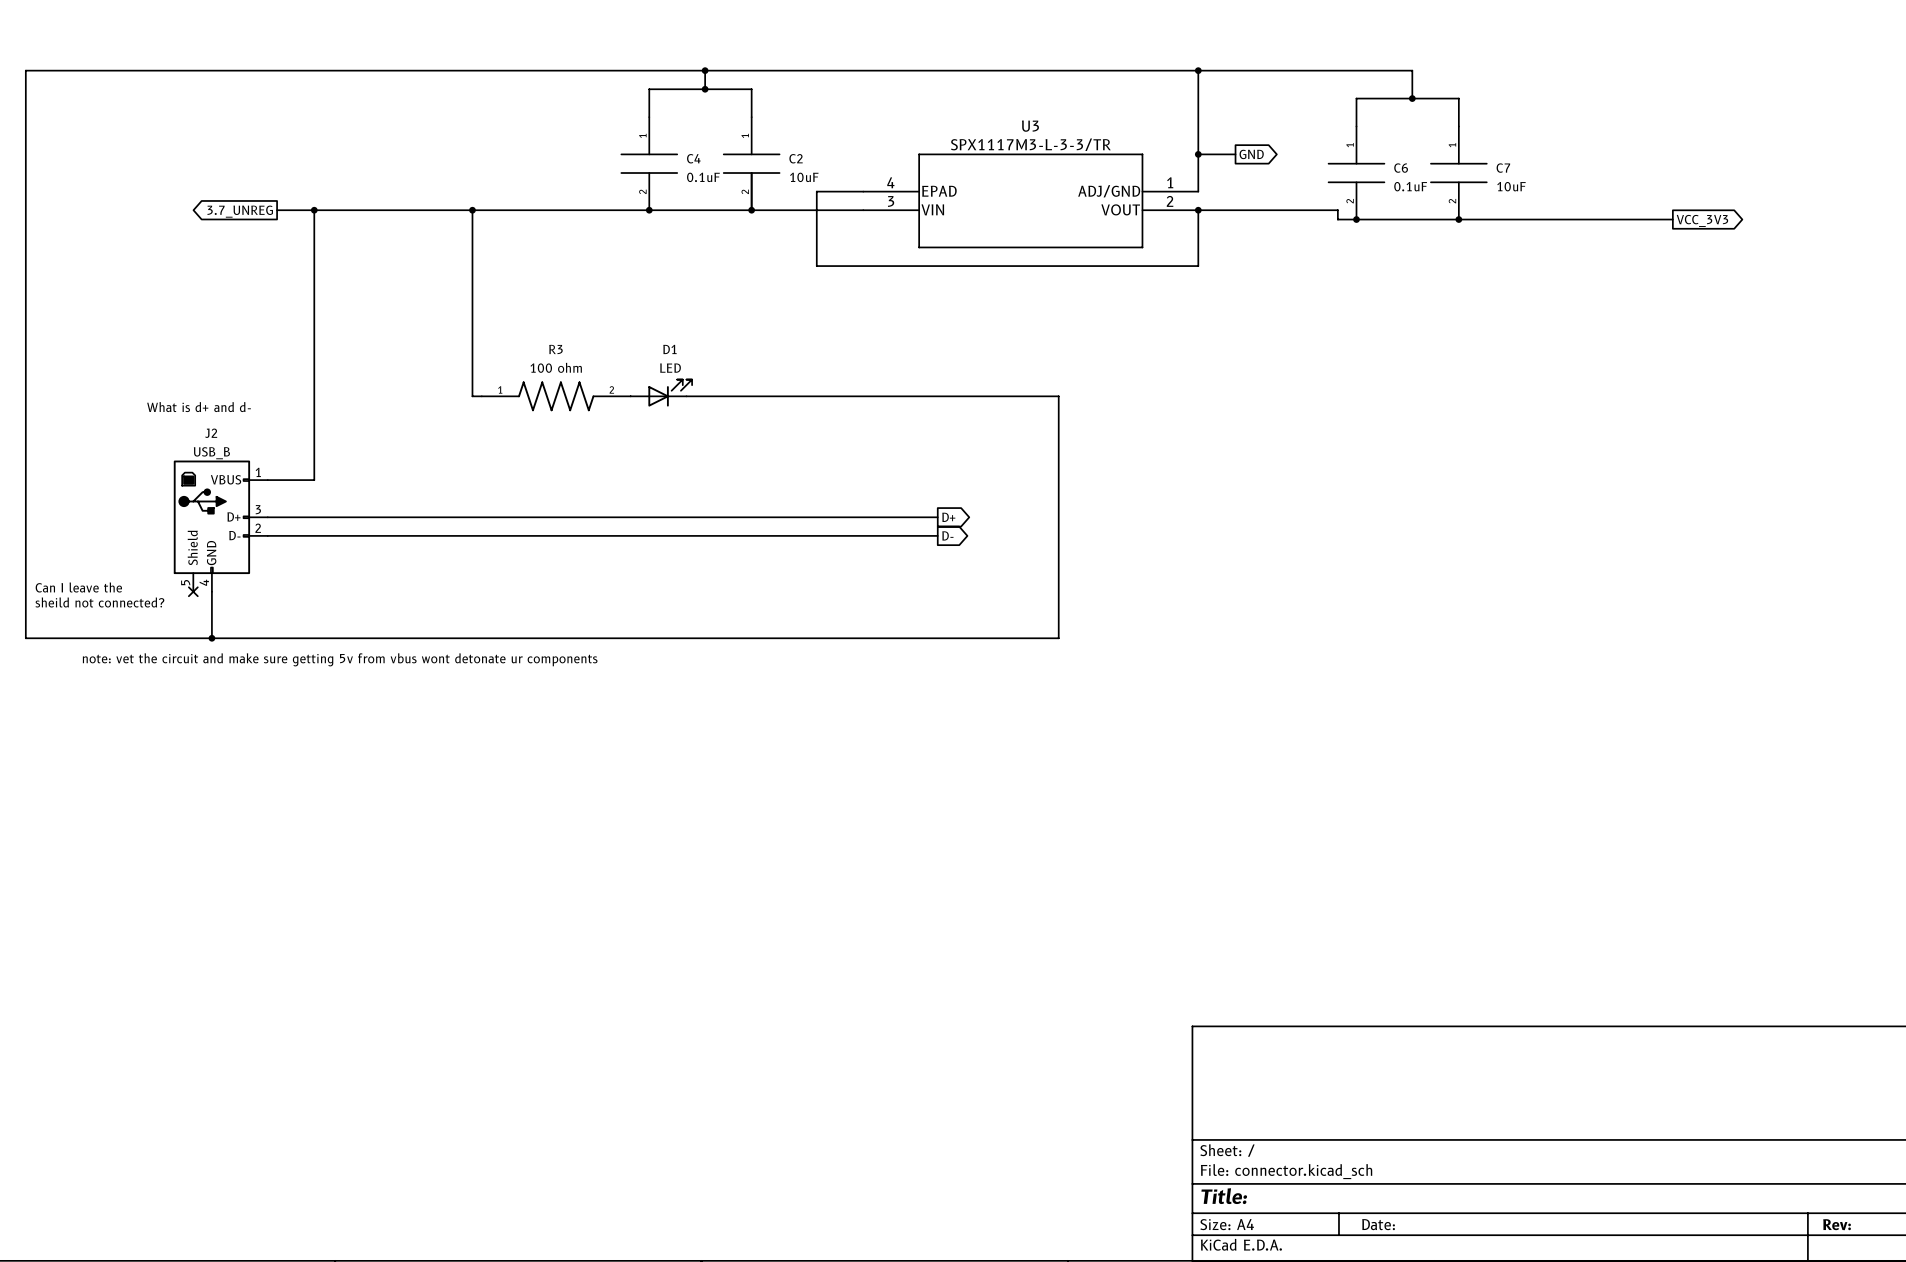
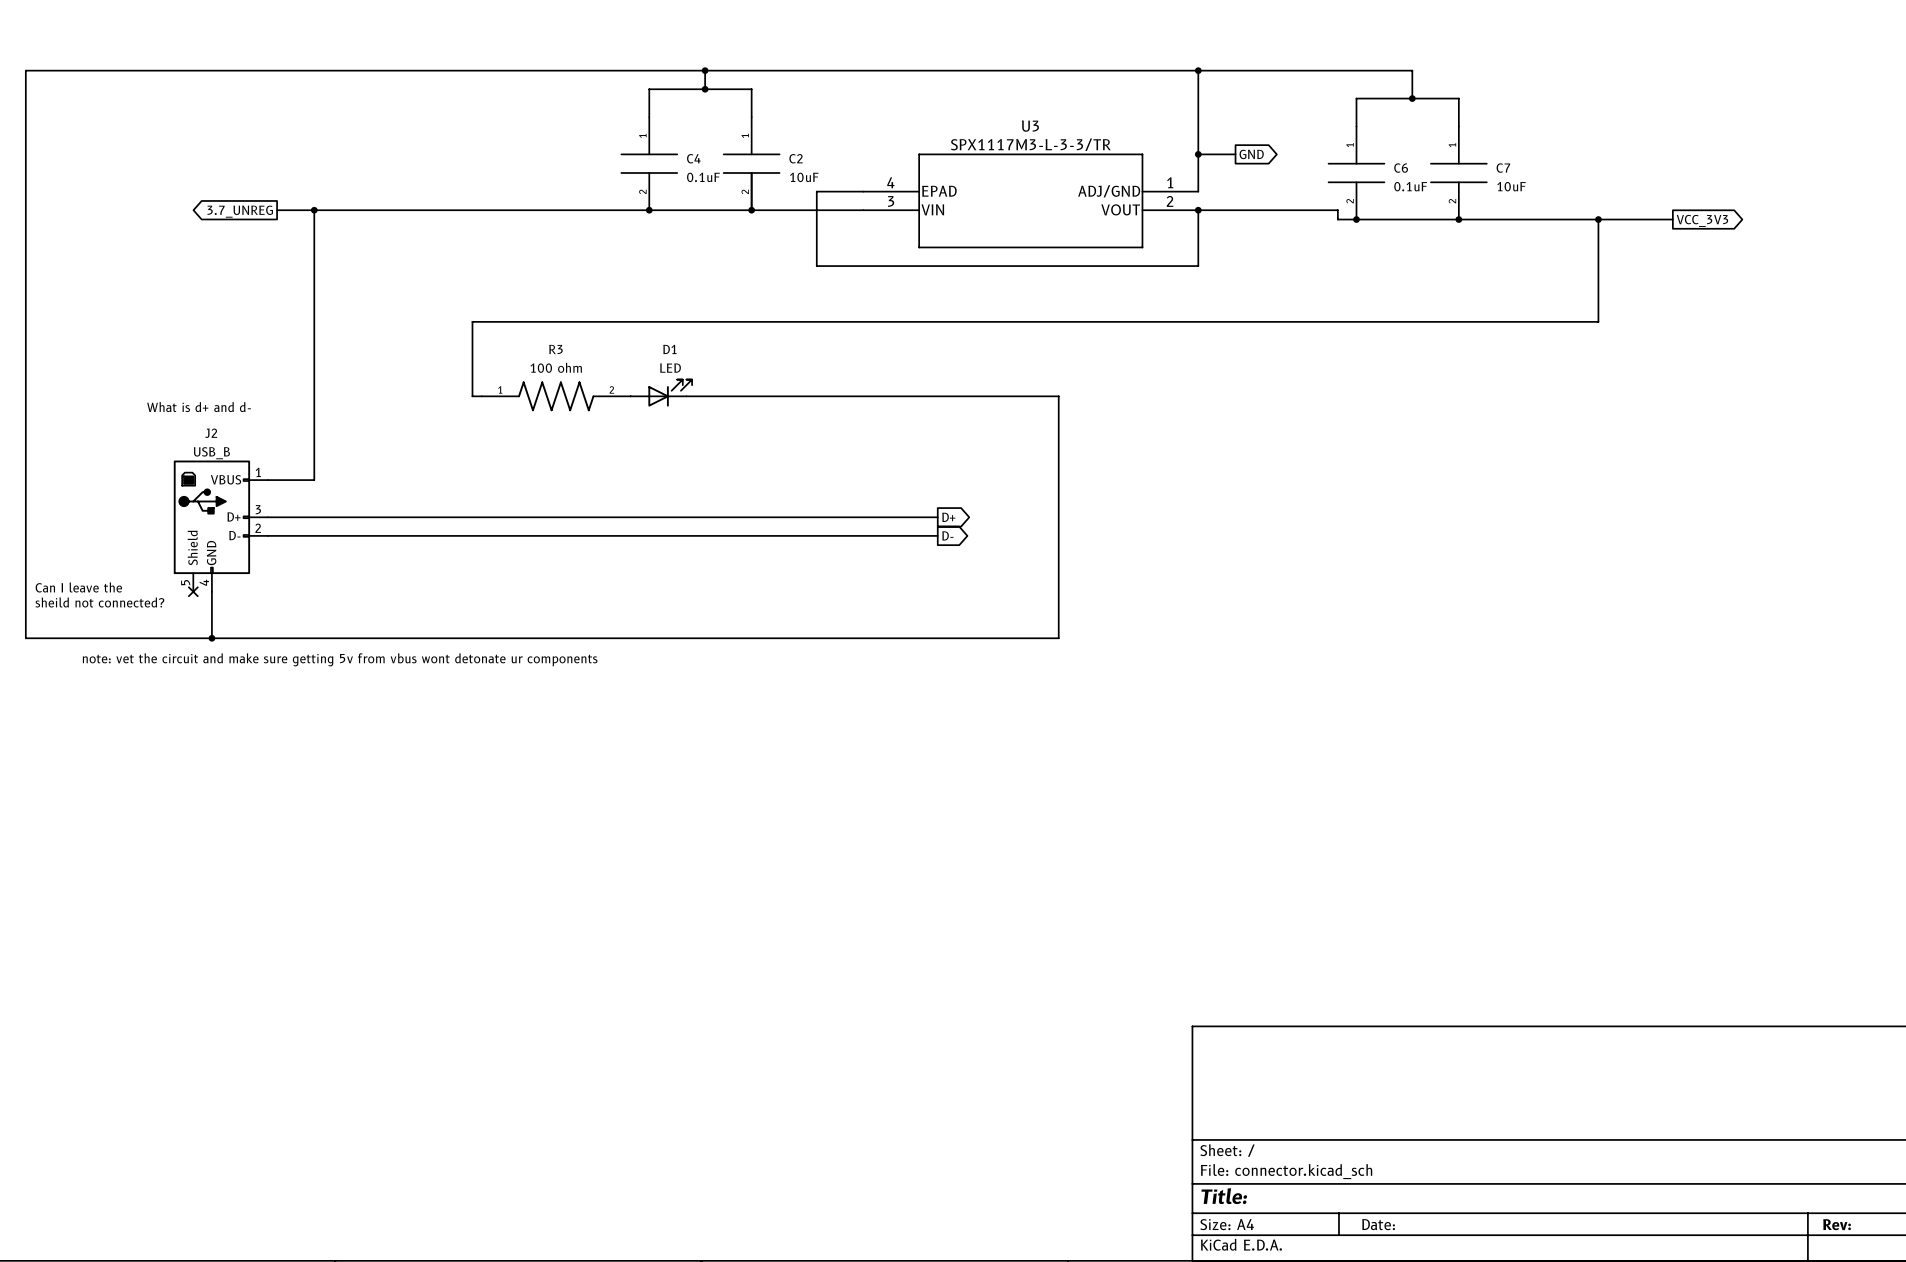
wire: (472, 210) (472, 321) -> (1598, 219) (1598, 321) (472, 321)
junction: (472, 210) -> none
junction: none -> (1598, 219)

